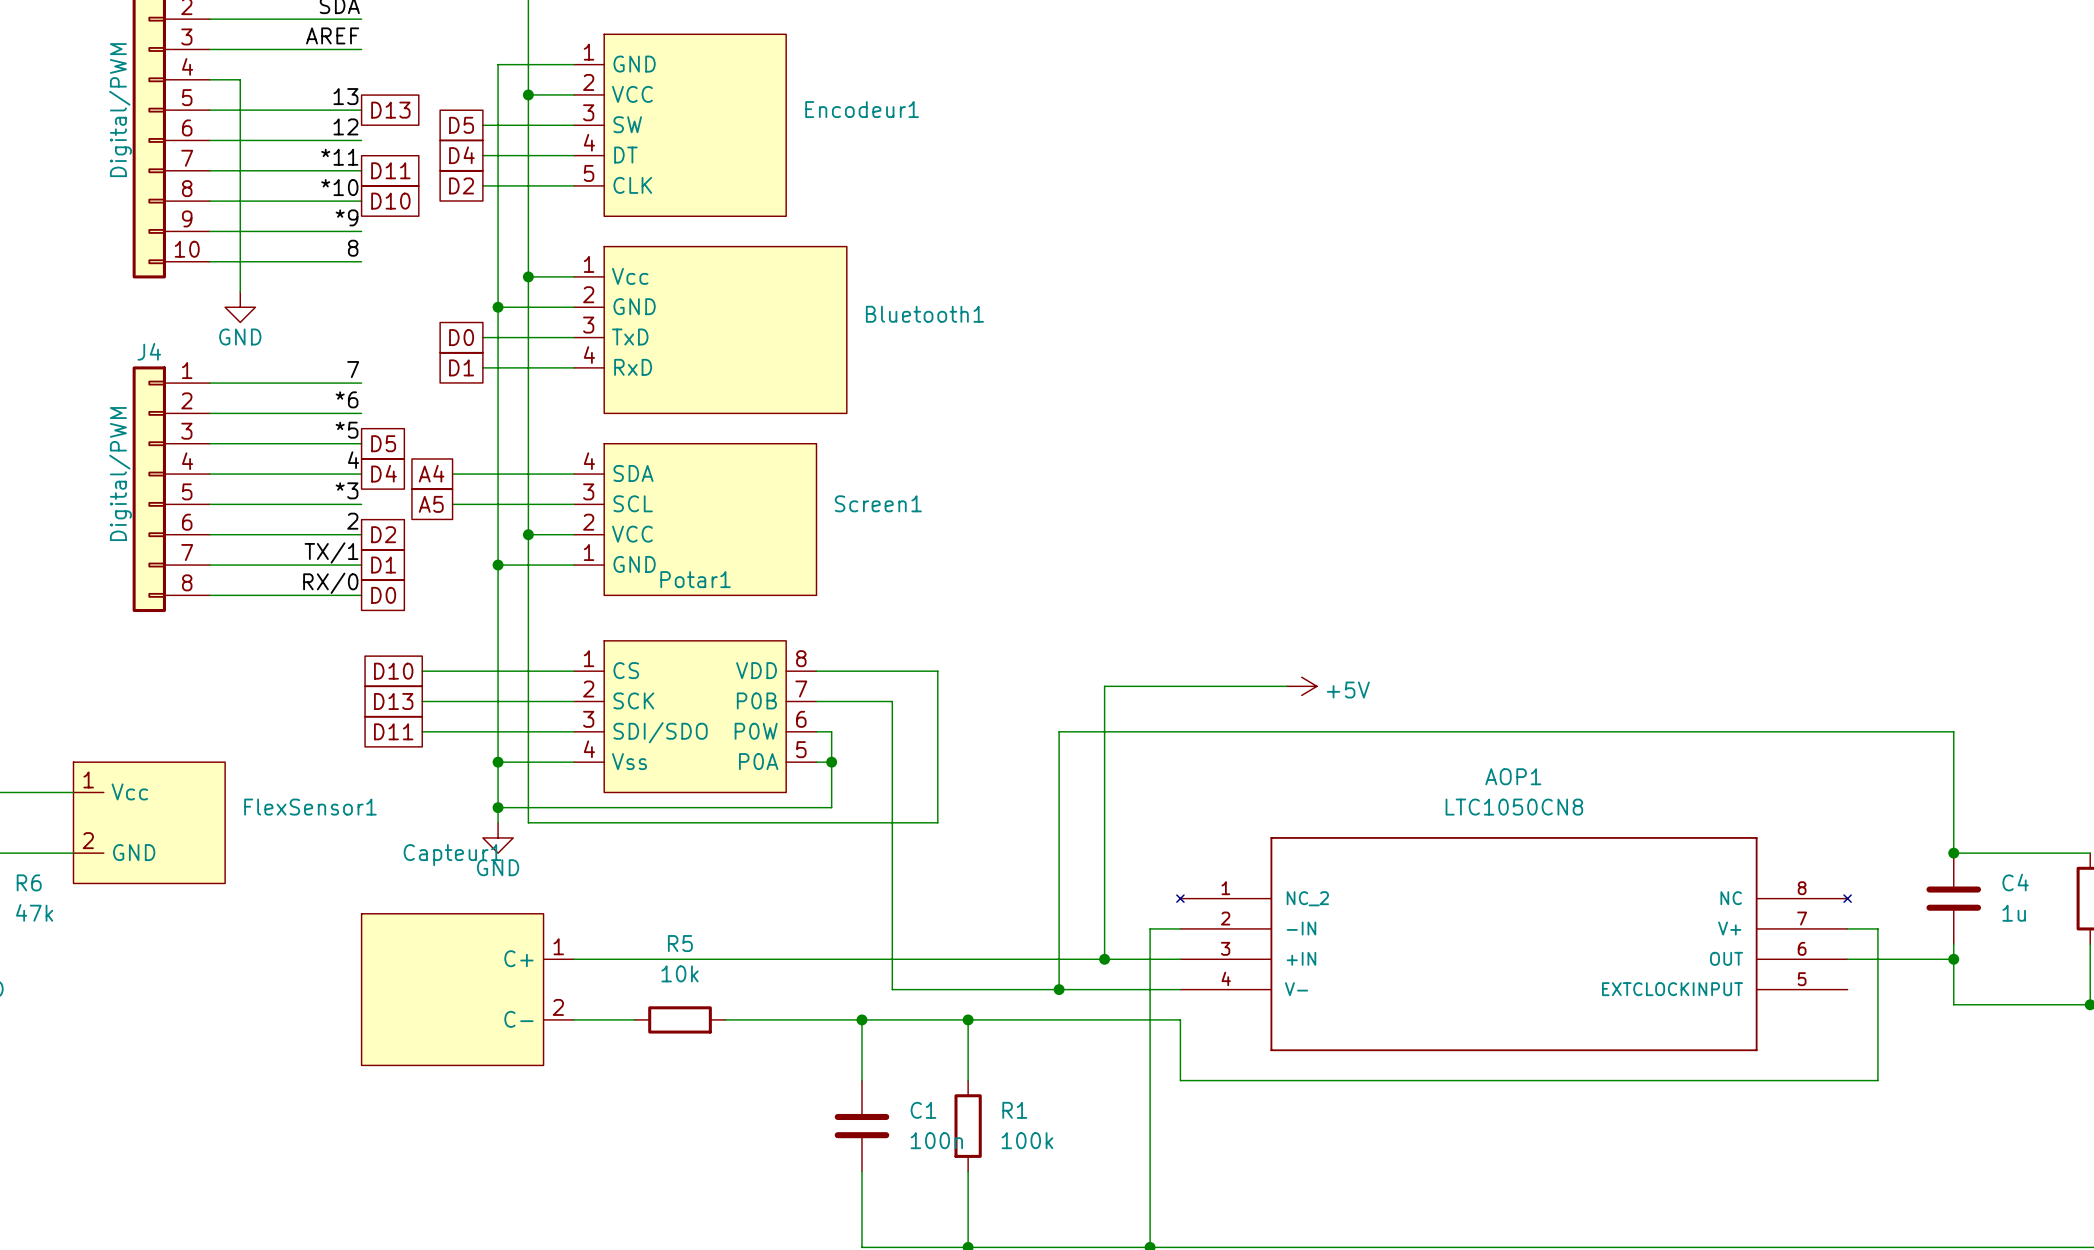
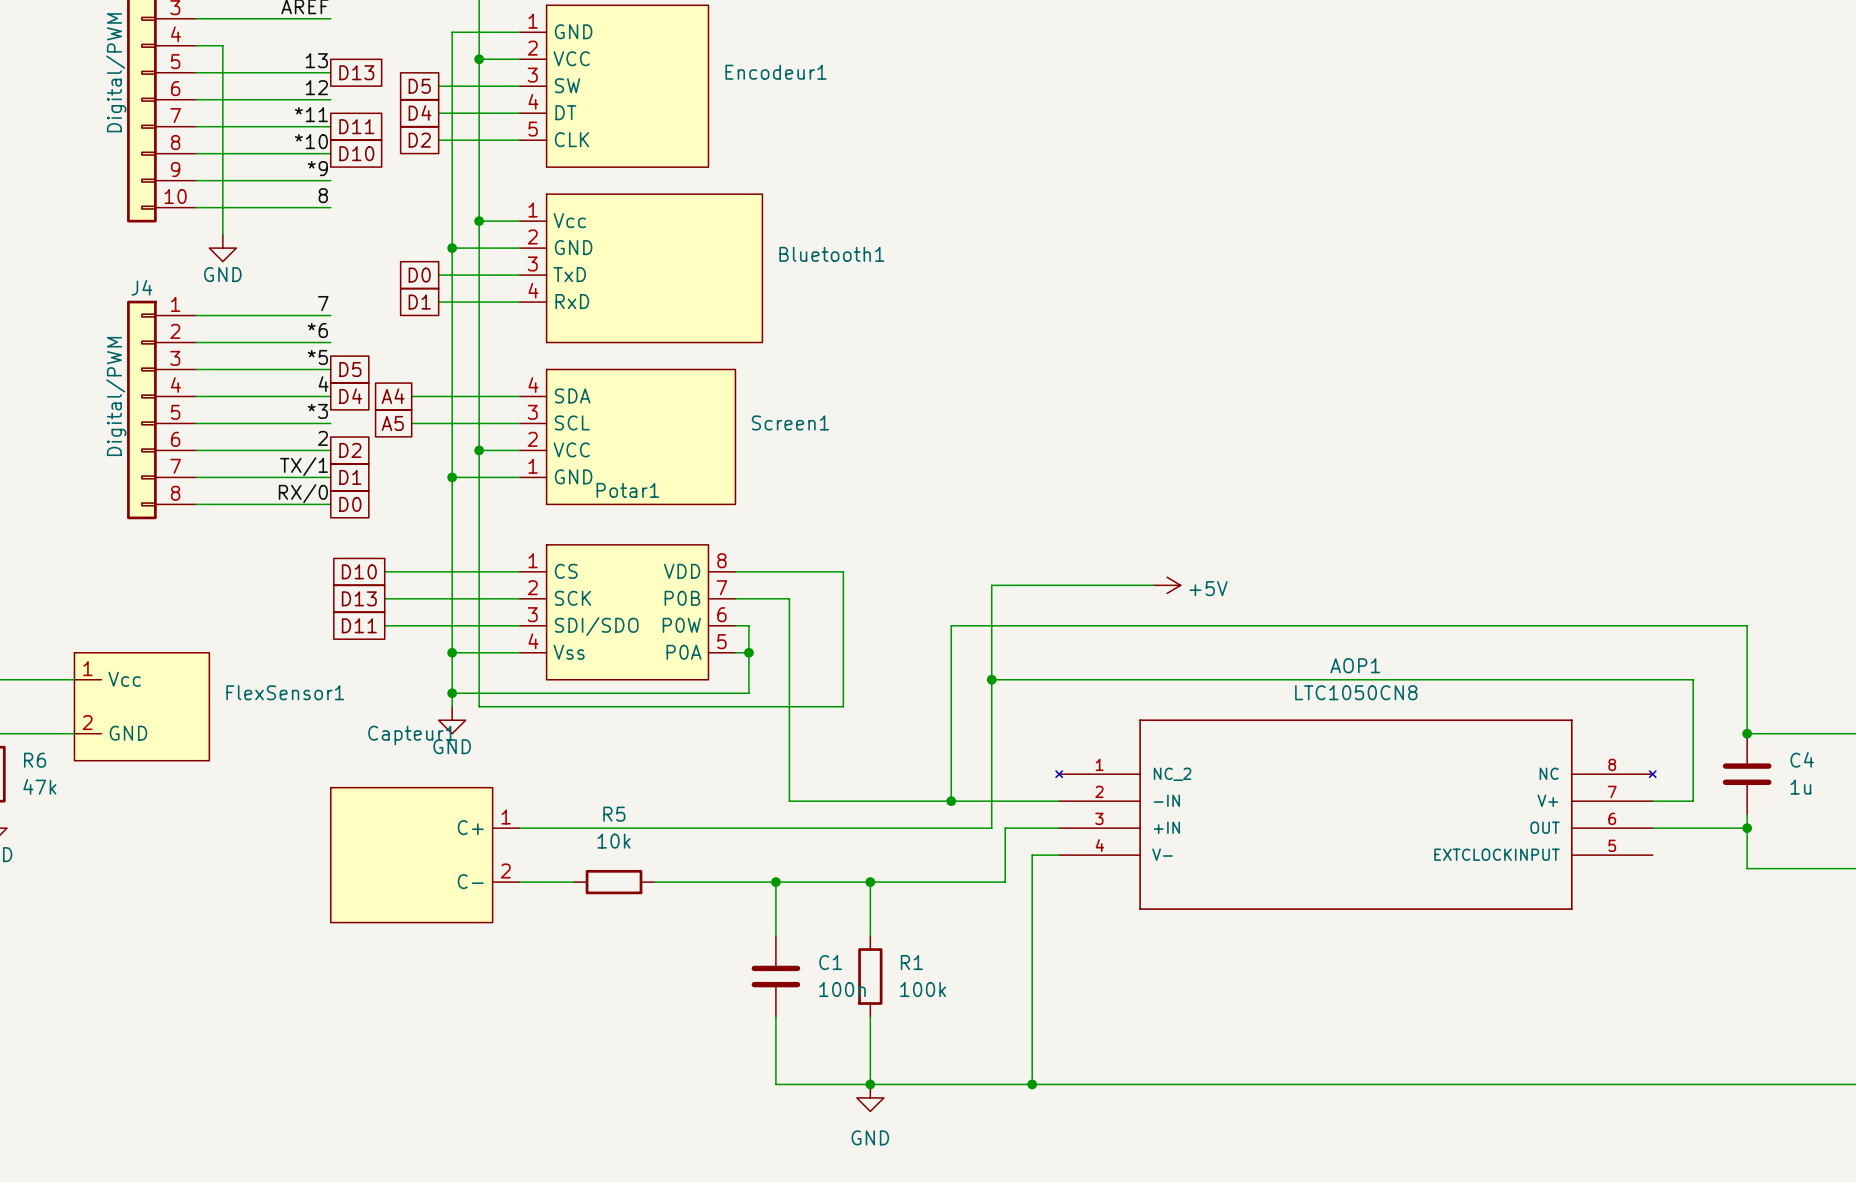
wire: (877, 701) (892, 701) (892, 989) (1150, 989) (1150, 928) -> (789, 598) (789, 801) (1032, 801)
junction: none -> (991, 679)
wire: (1059, 928) (1059, 989) -> none
junction: none -> (951, 801)
wire: (1877, 928) (1877, 1080) (1180, 1080) (1180, 1019) (1119, 1019) -> (1679, 801) (1693, 801) (1693, 679) (991, 679)
wire: (1104, 959) (1119, 959) -> (1005, 882) (1005, 828)
junction: (1104, 959) -> none
junction: (1059, 989) -> none

